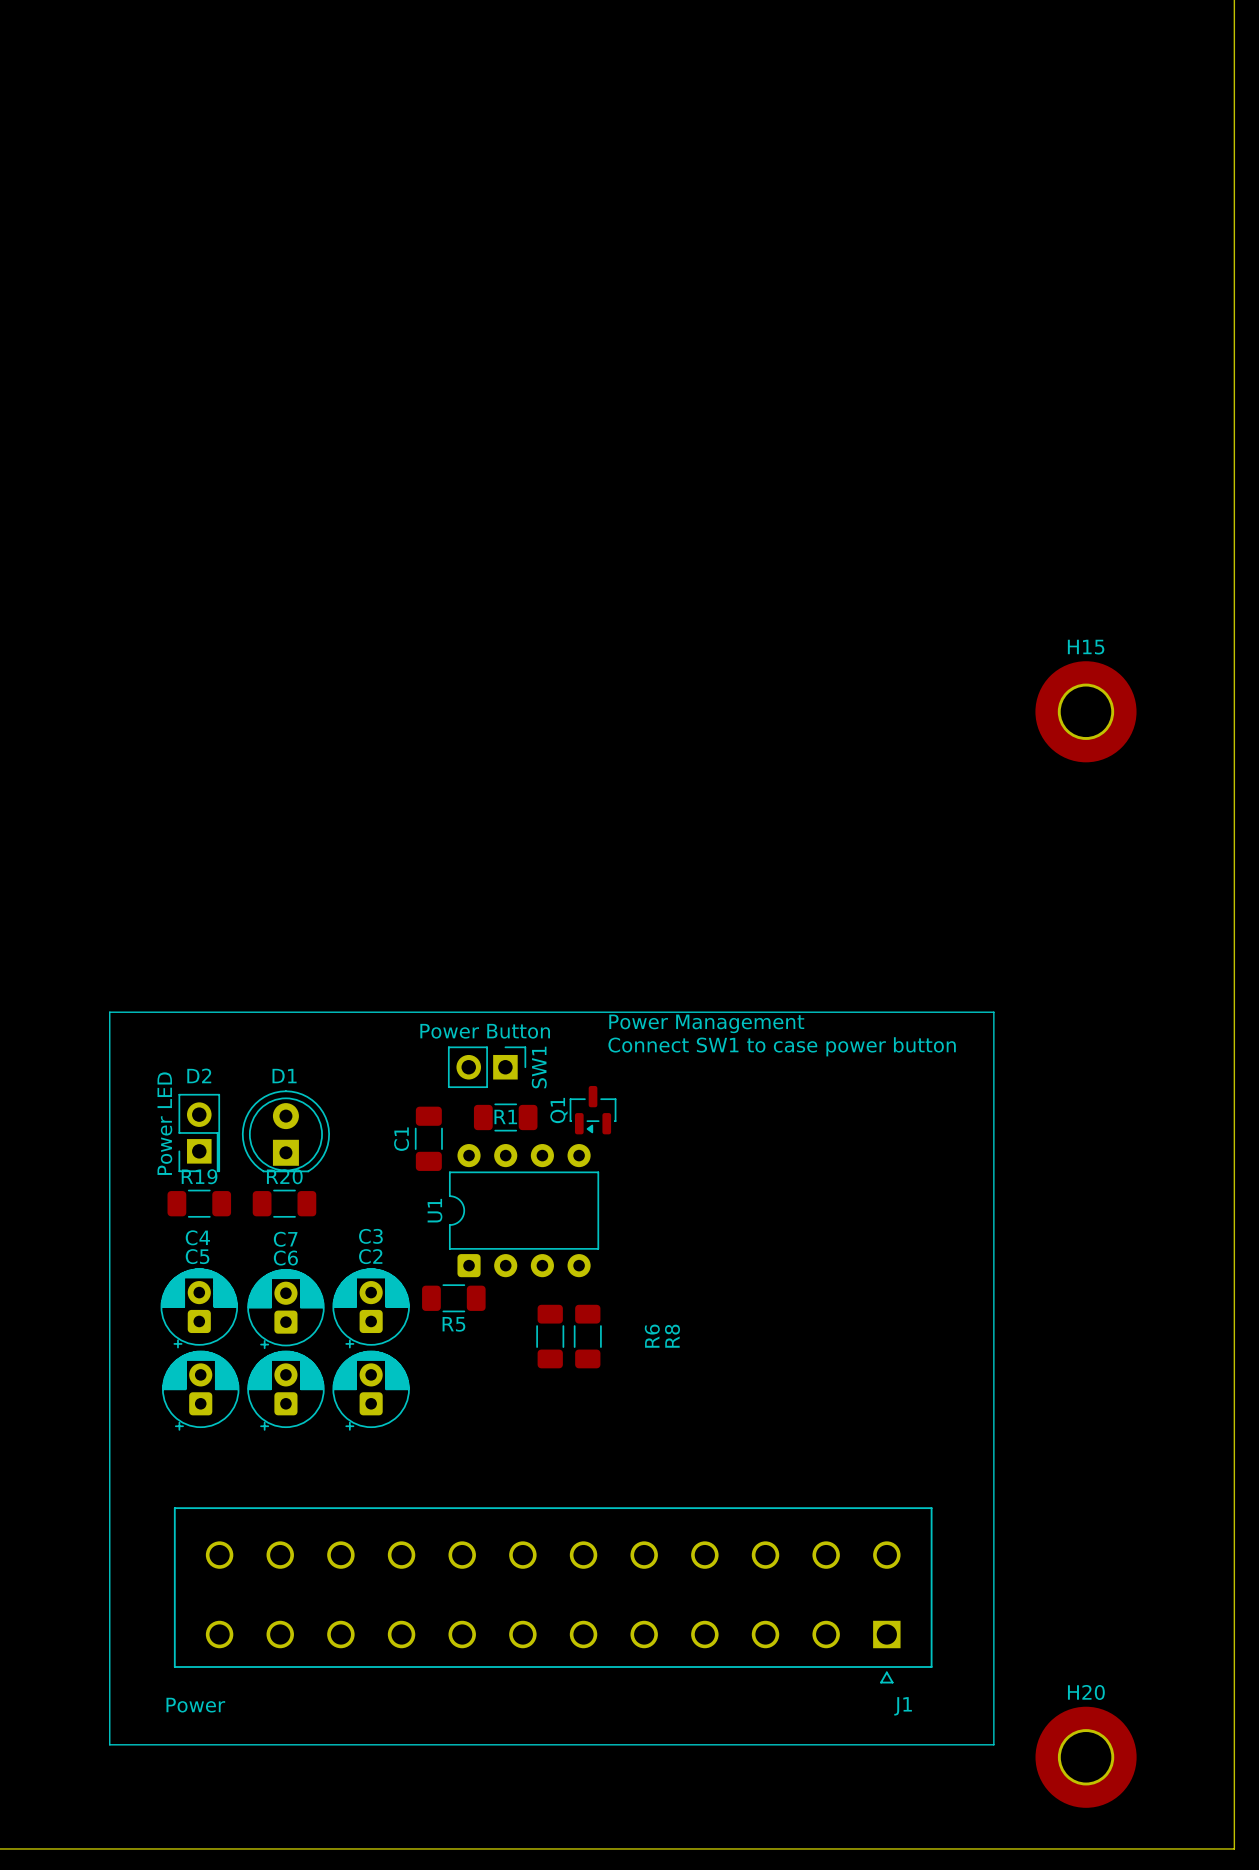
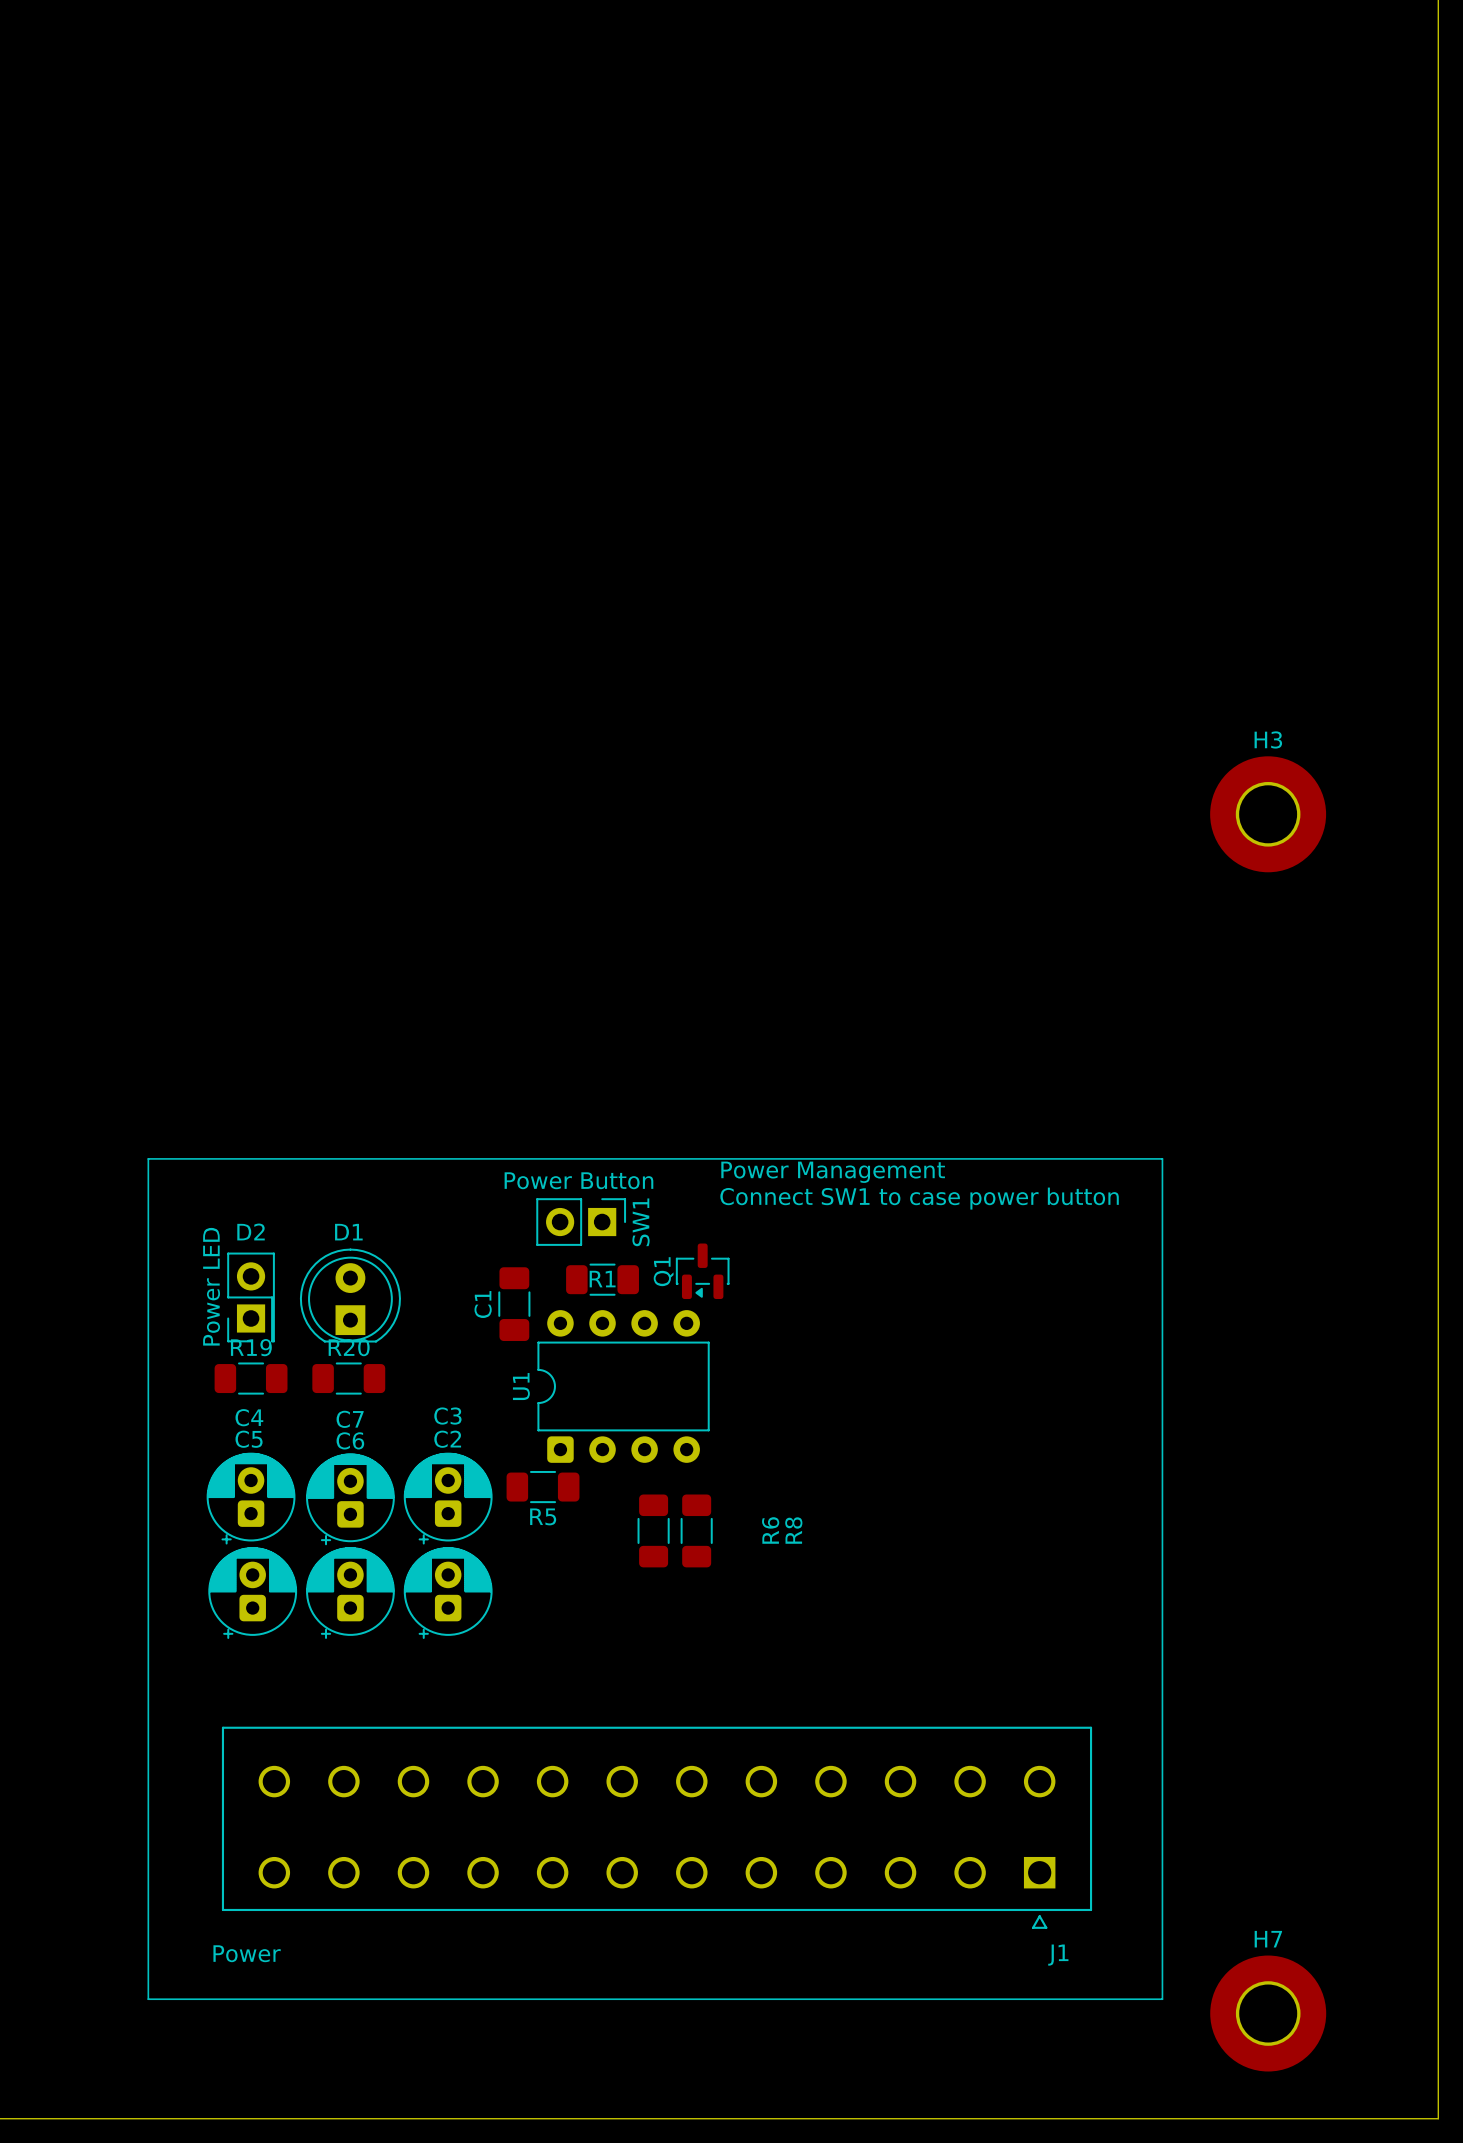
H15 name: H15 (1086, 647) -> H3 (1268, 739)
H20 name: H20 (1086, 1692) -> H7 (1268, 1939)

